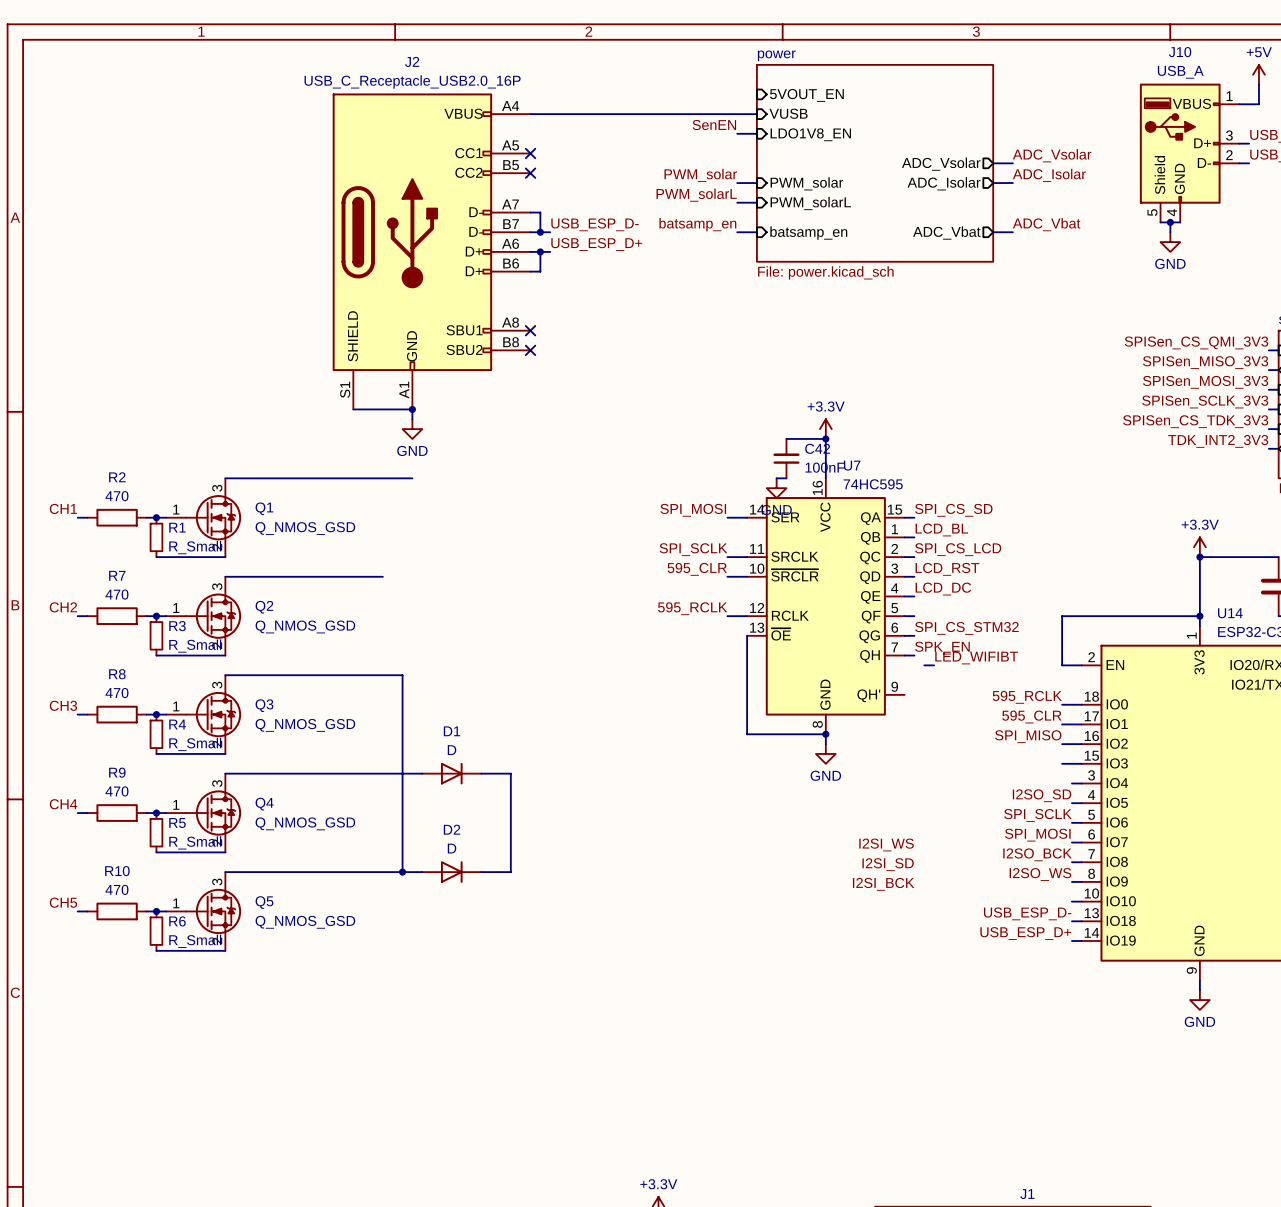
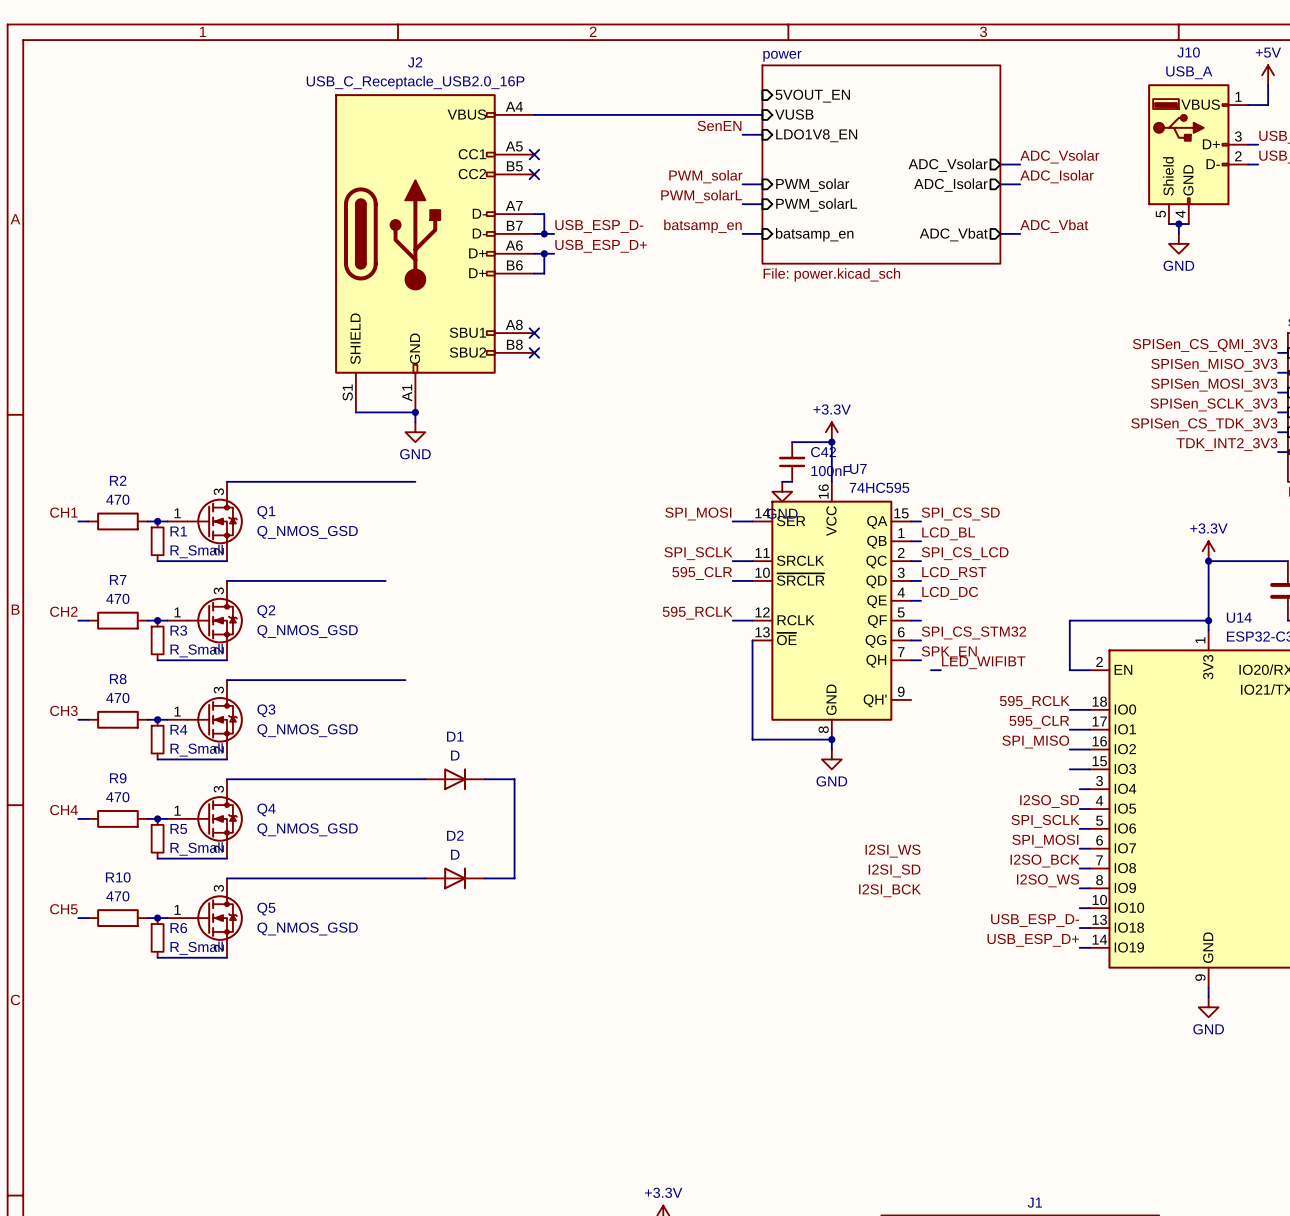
wire: (402, 675) (402, 872) -> none
junction: (402, 872) -> none

